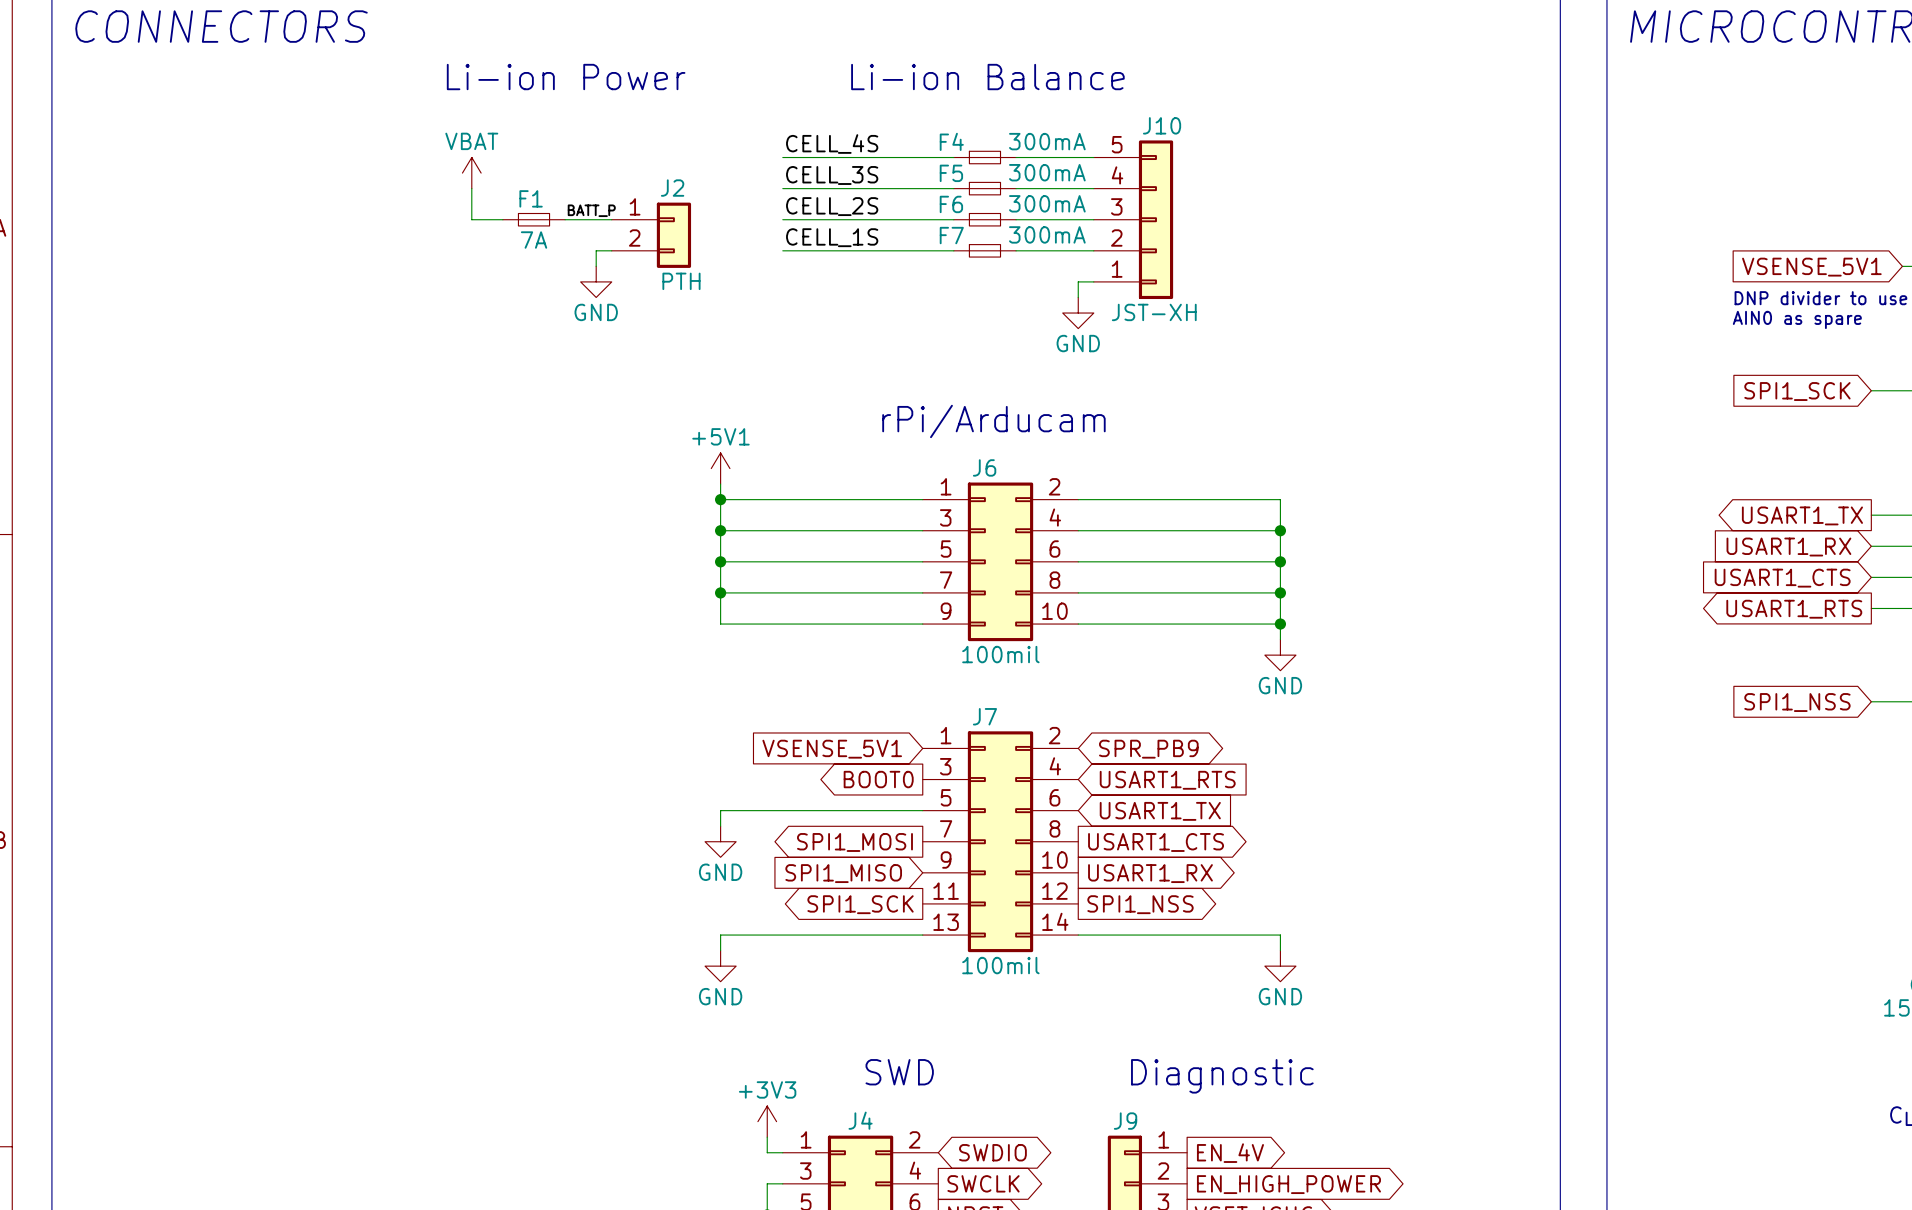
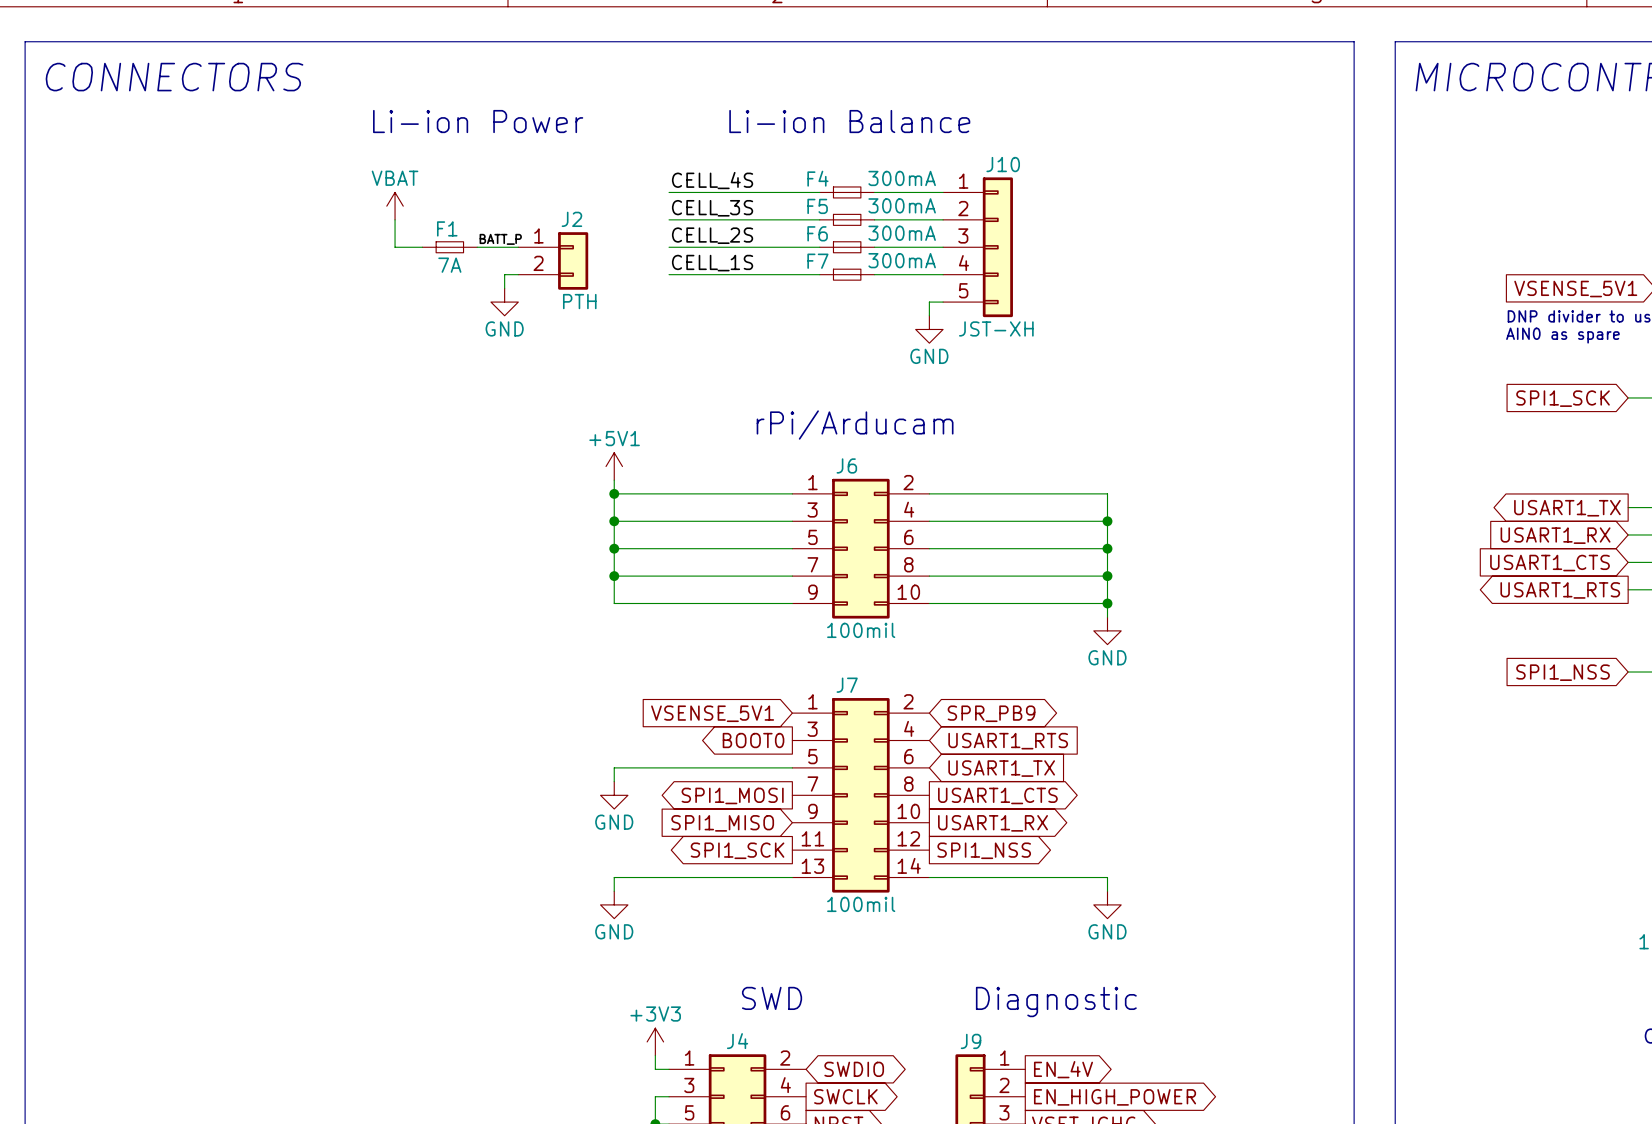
J10 flip: as is (1156, 219) -> up-down (997, 247)

